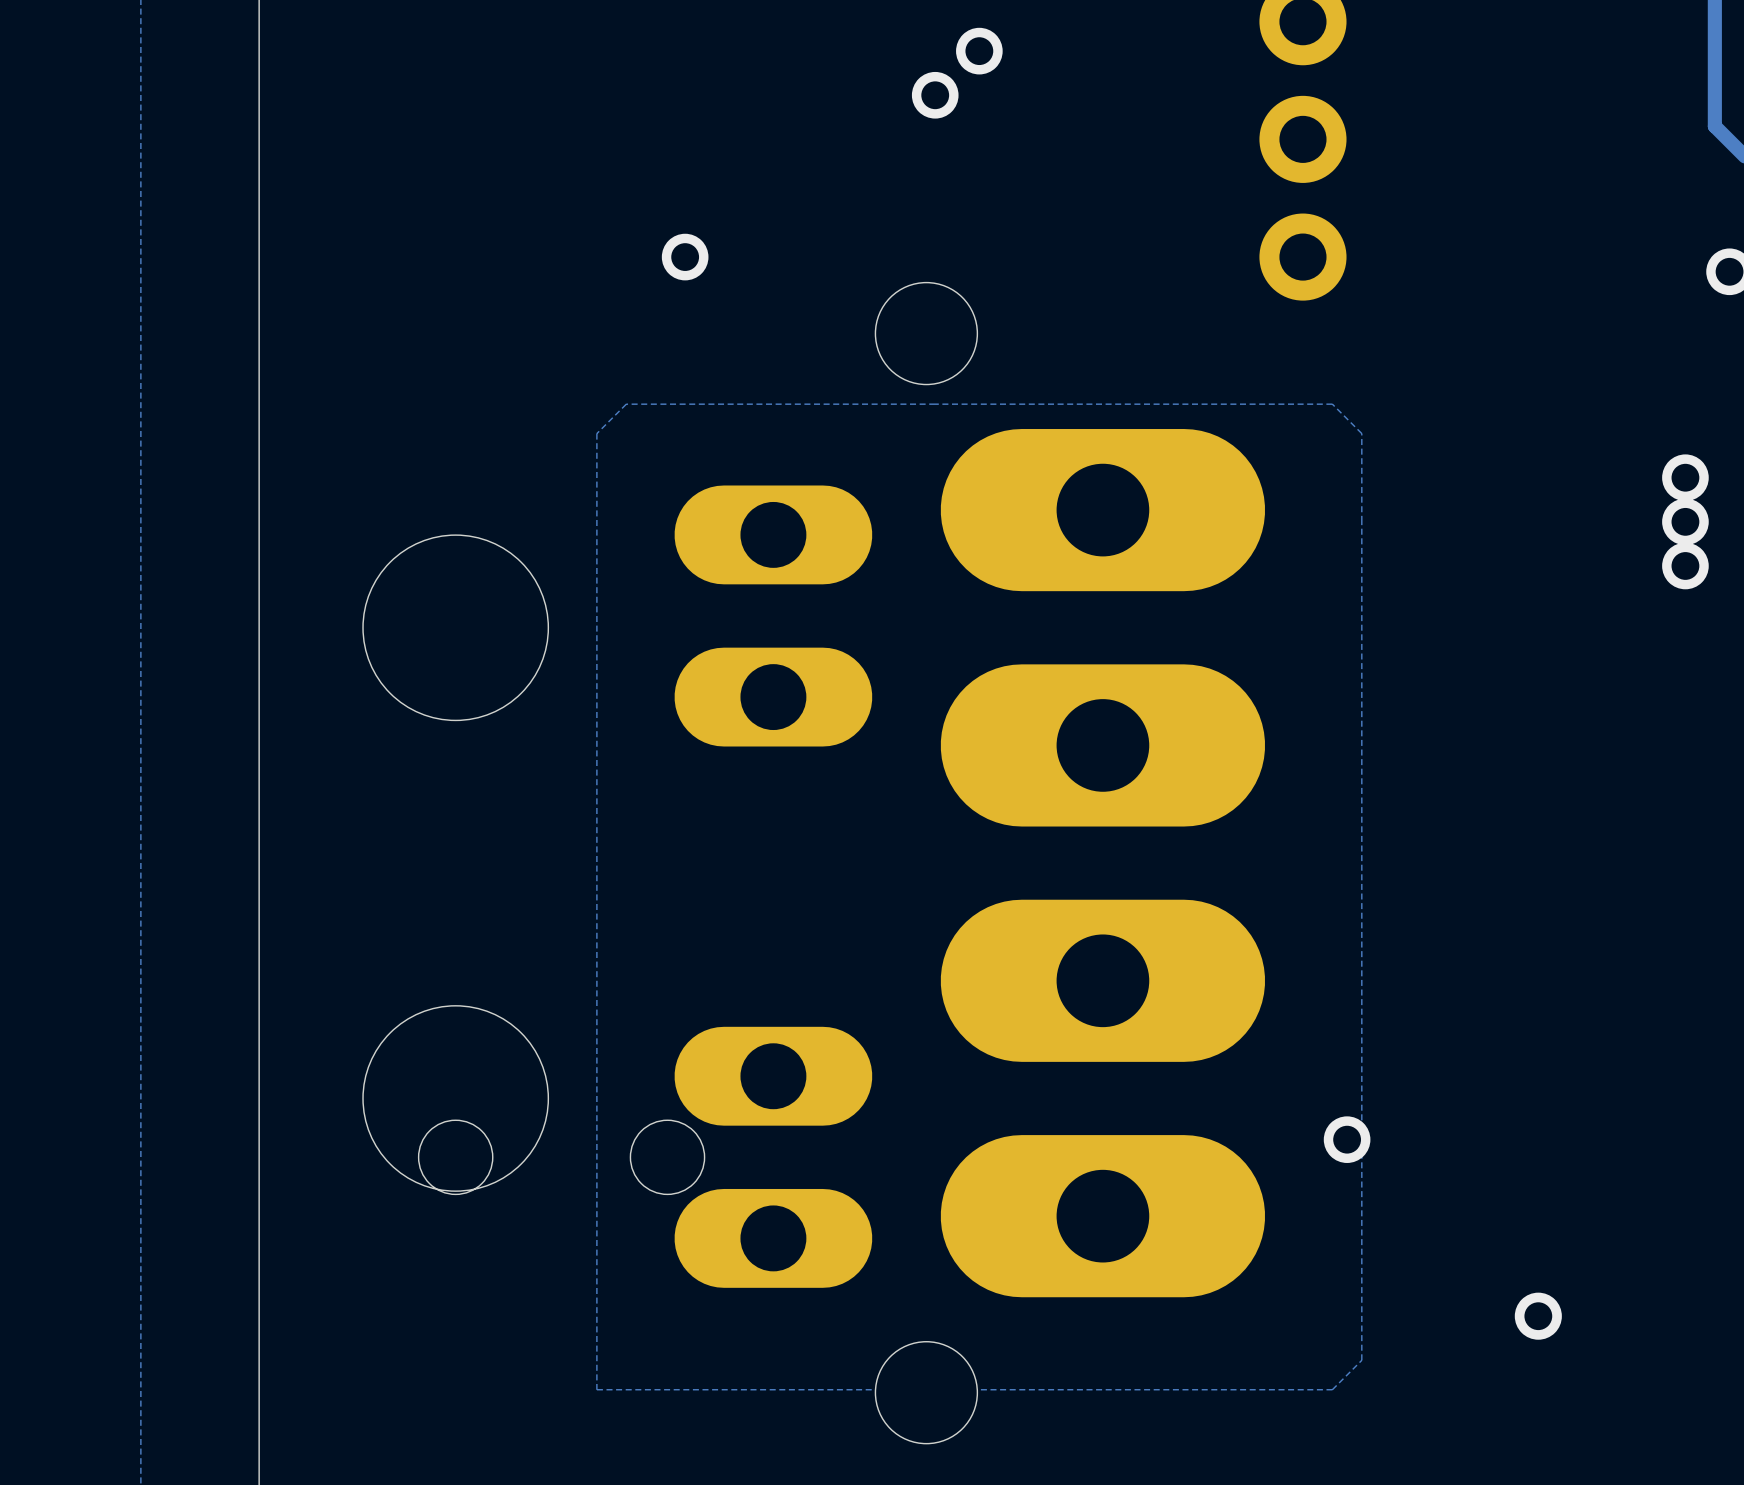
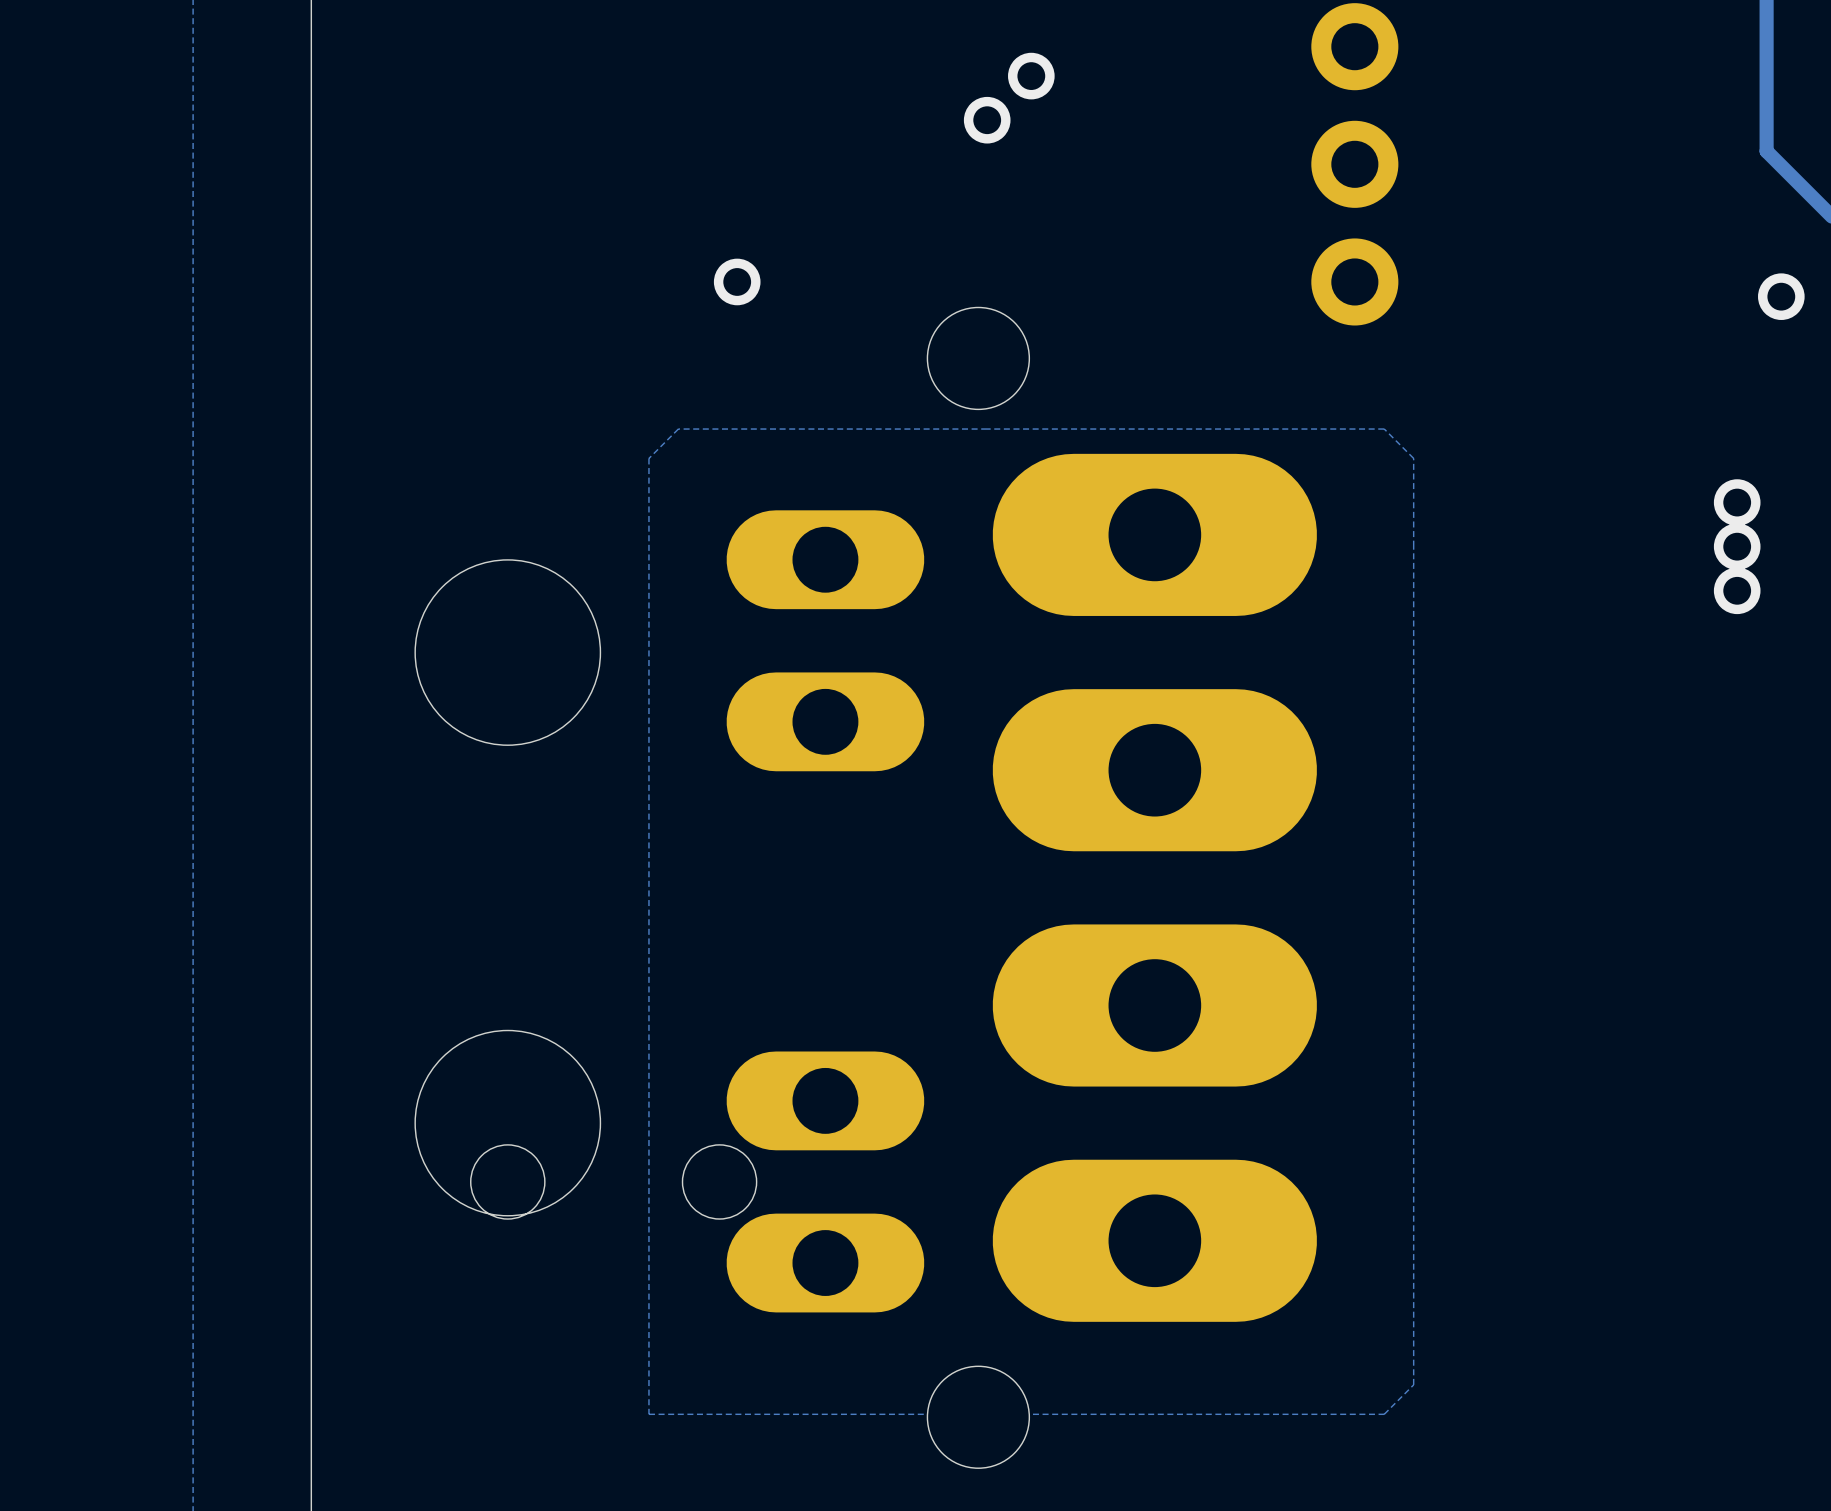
via: (1347, 1139) -> none
via: (1538, 1316) -> none

